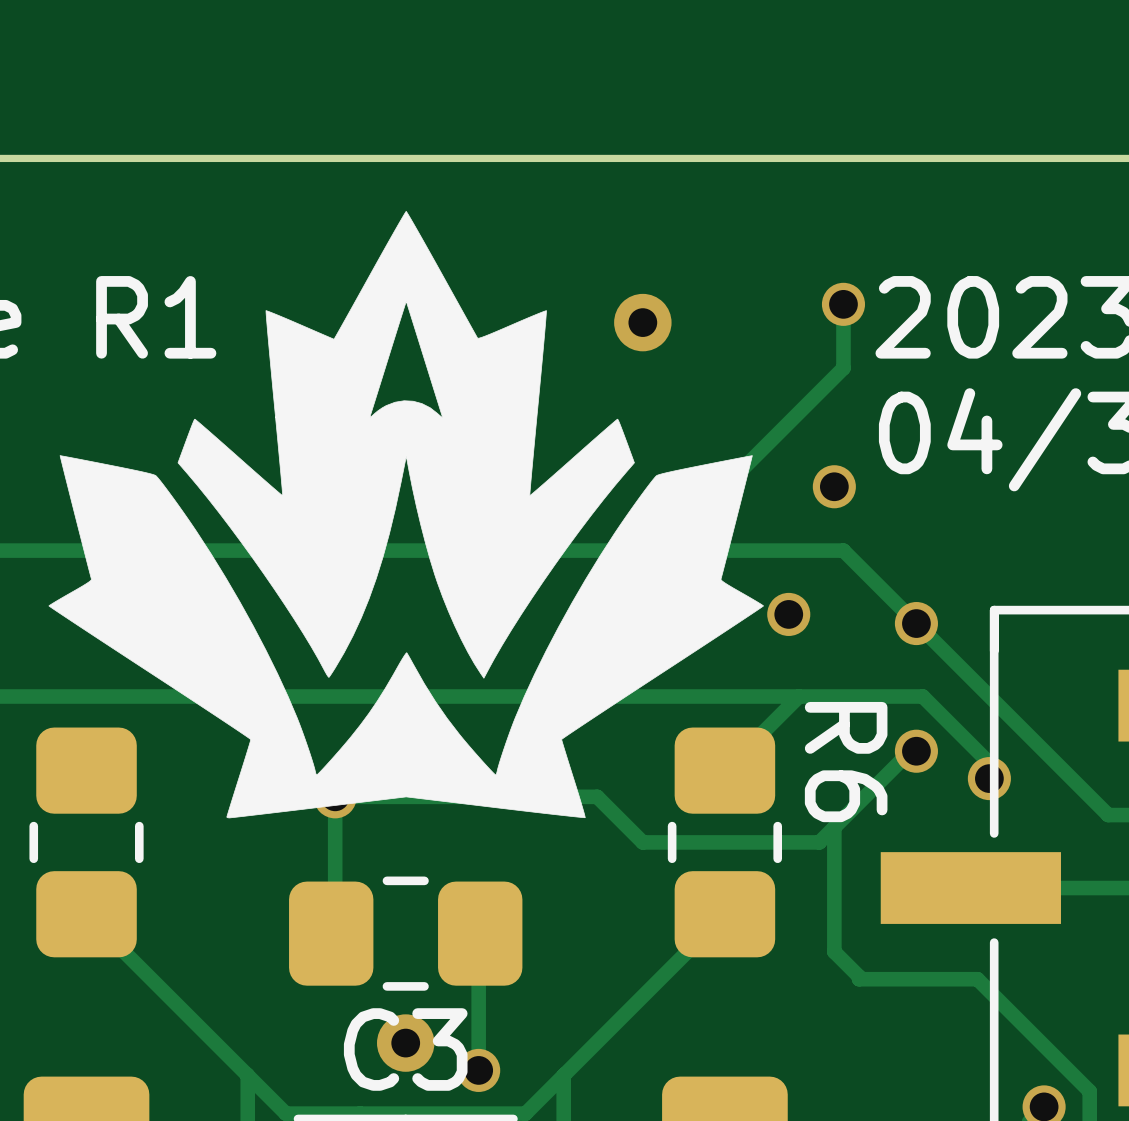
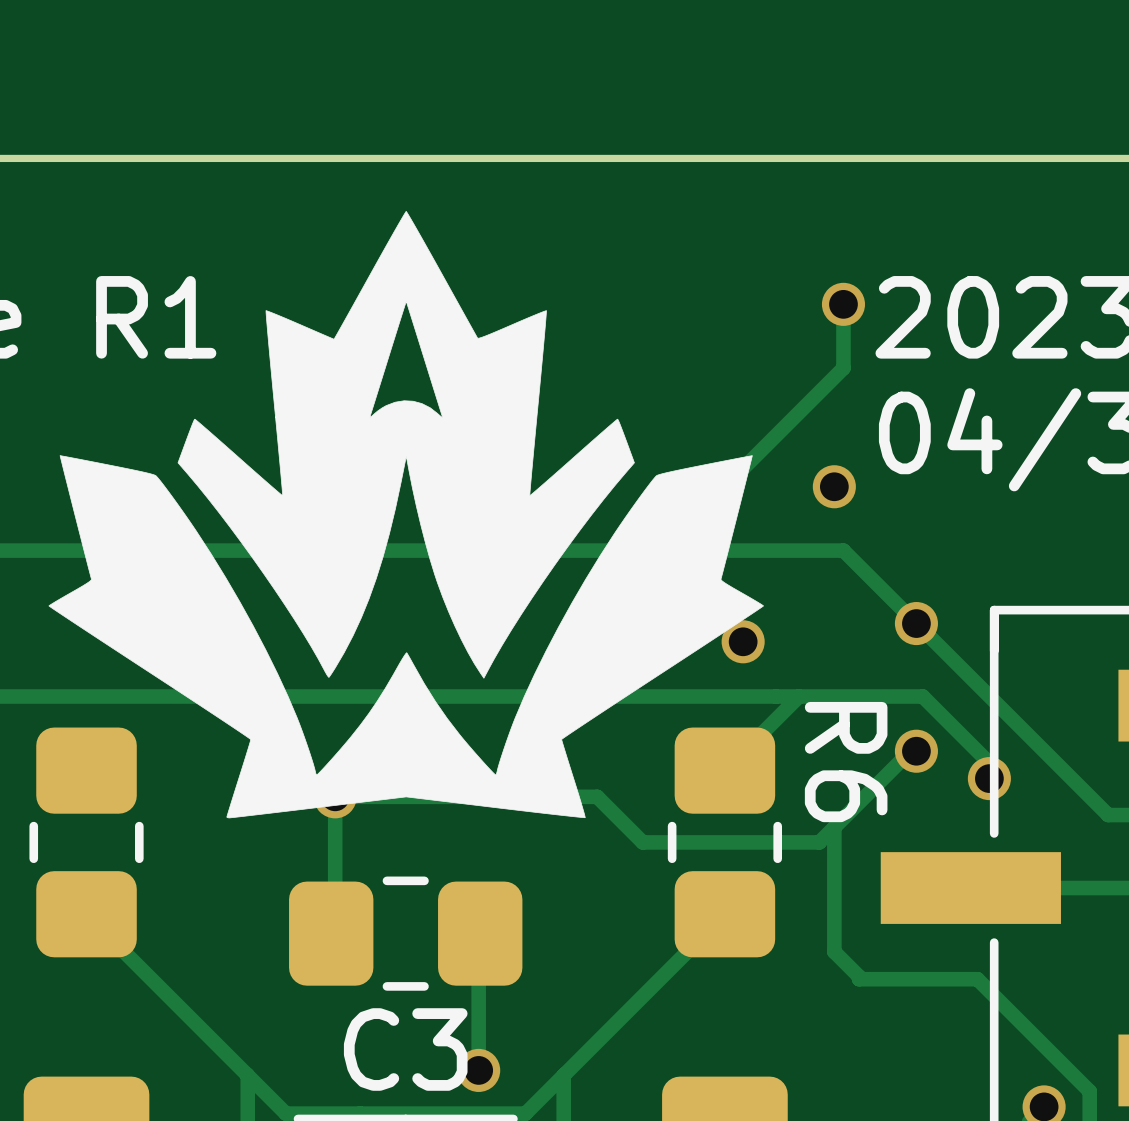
via: (642, 322) -> none
via position: (788, 614) -> (743, 641)
via: (405, 1043) -> none

